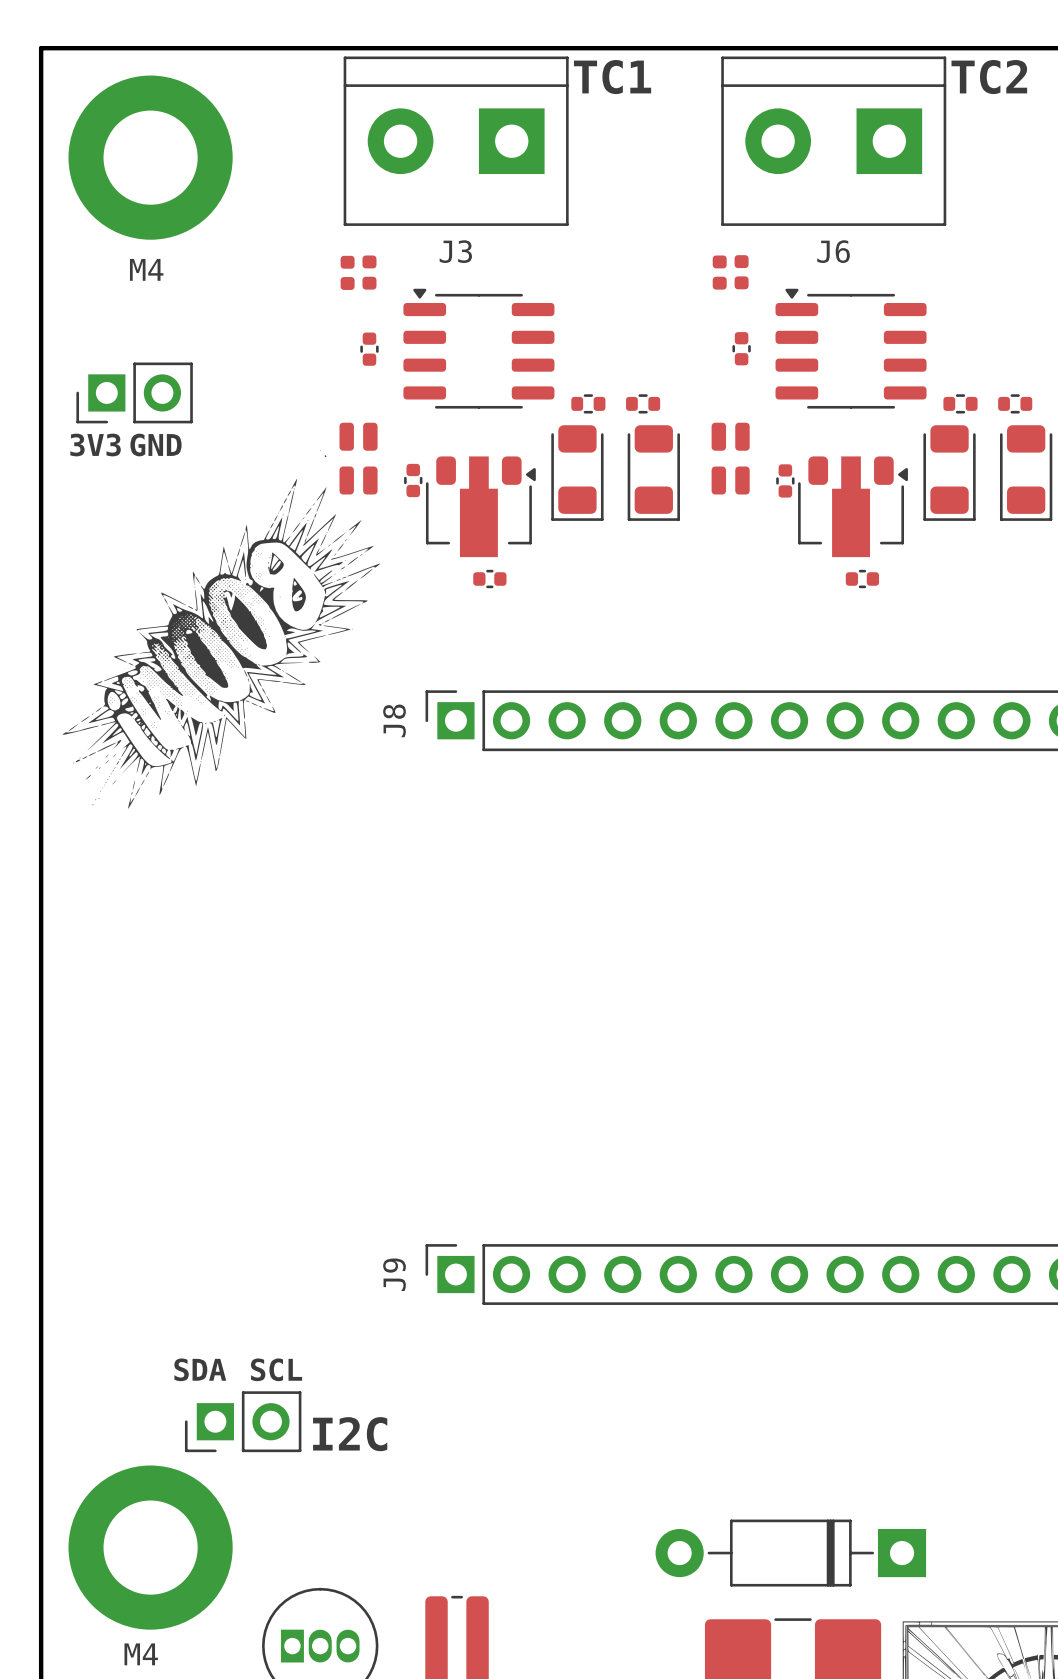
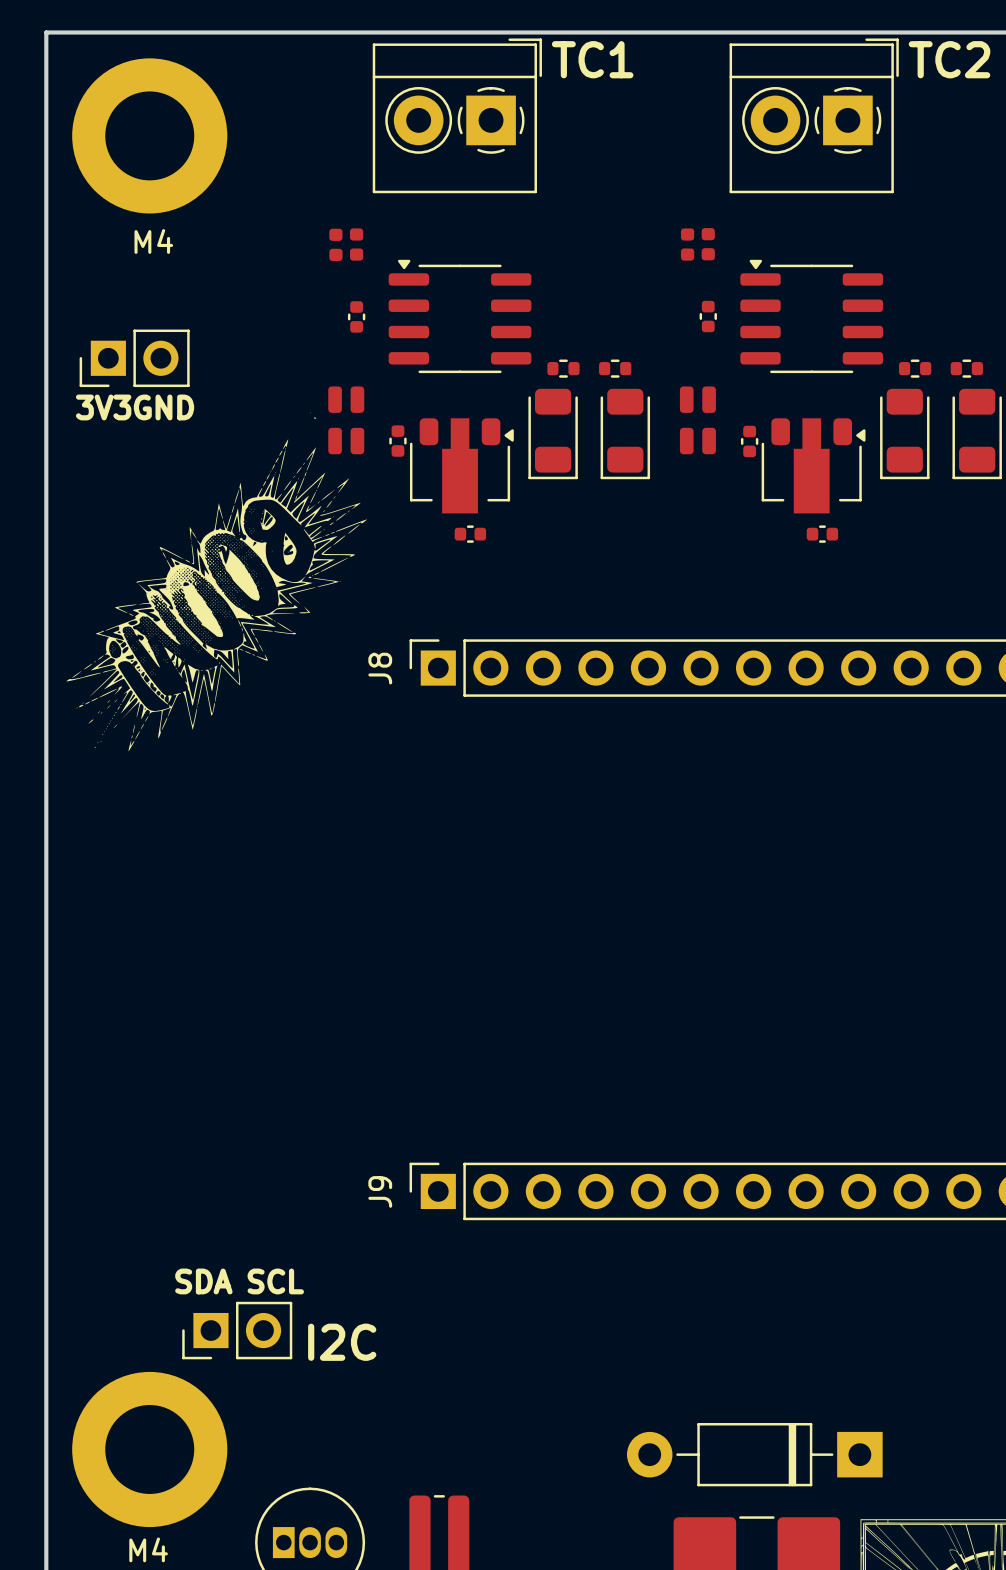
part: none -> (457, 115)
part: none -> (814, 115)
J3: (456, 141) -> none
J6: (833, 141) -> none

